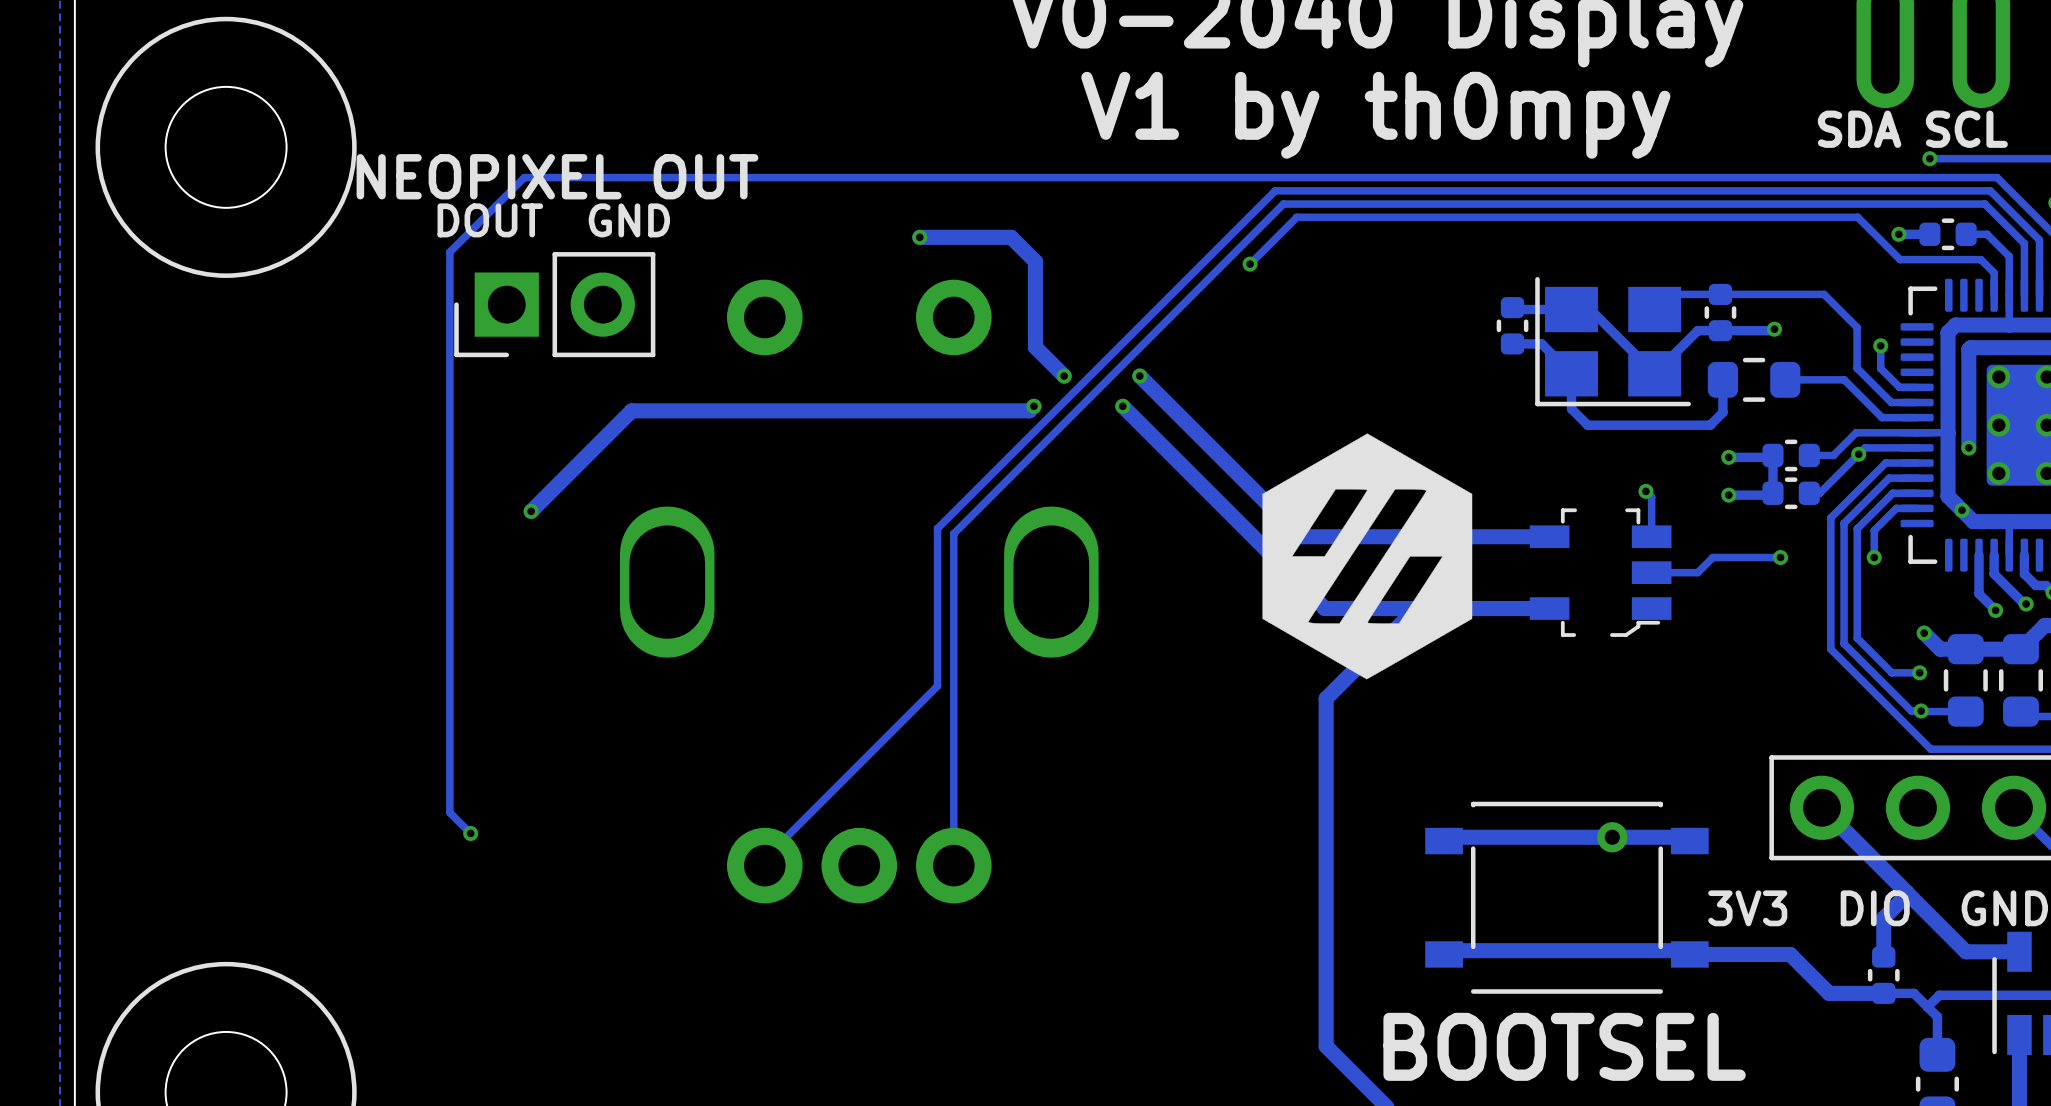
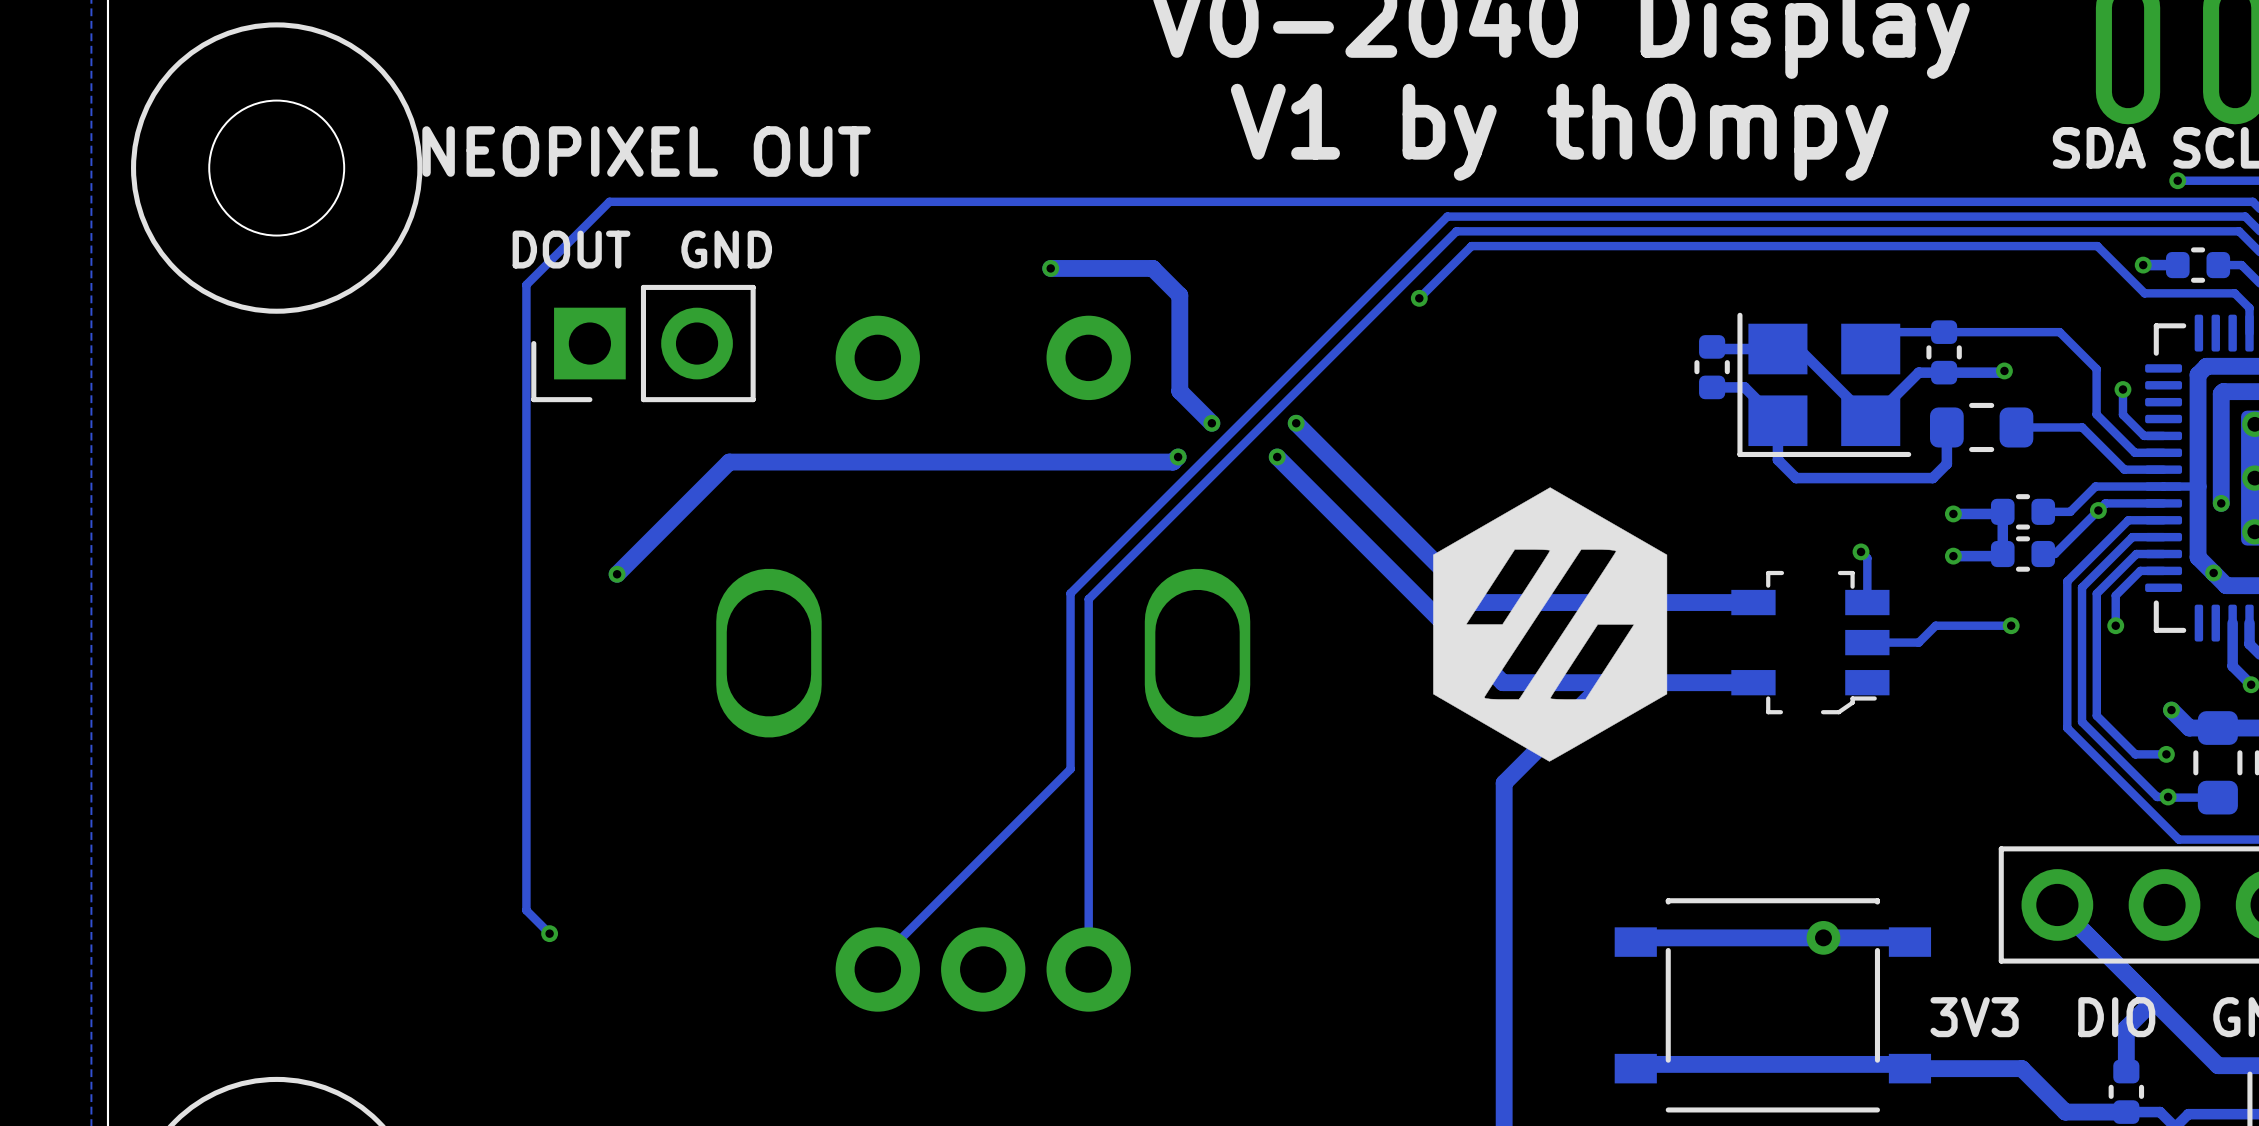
text position: NEOPIXEL OUT (557, 176) -> NEOPIXEL OUT (646, 151)

